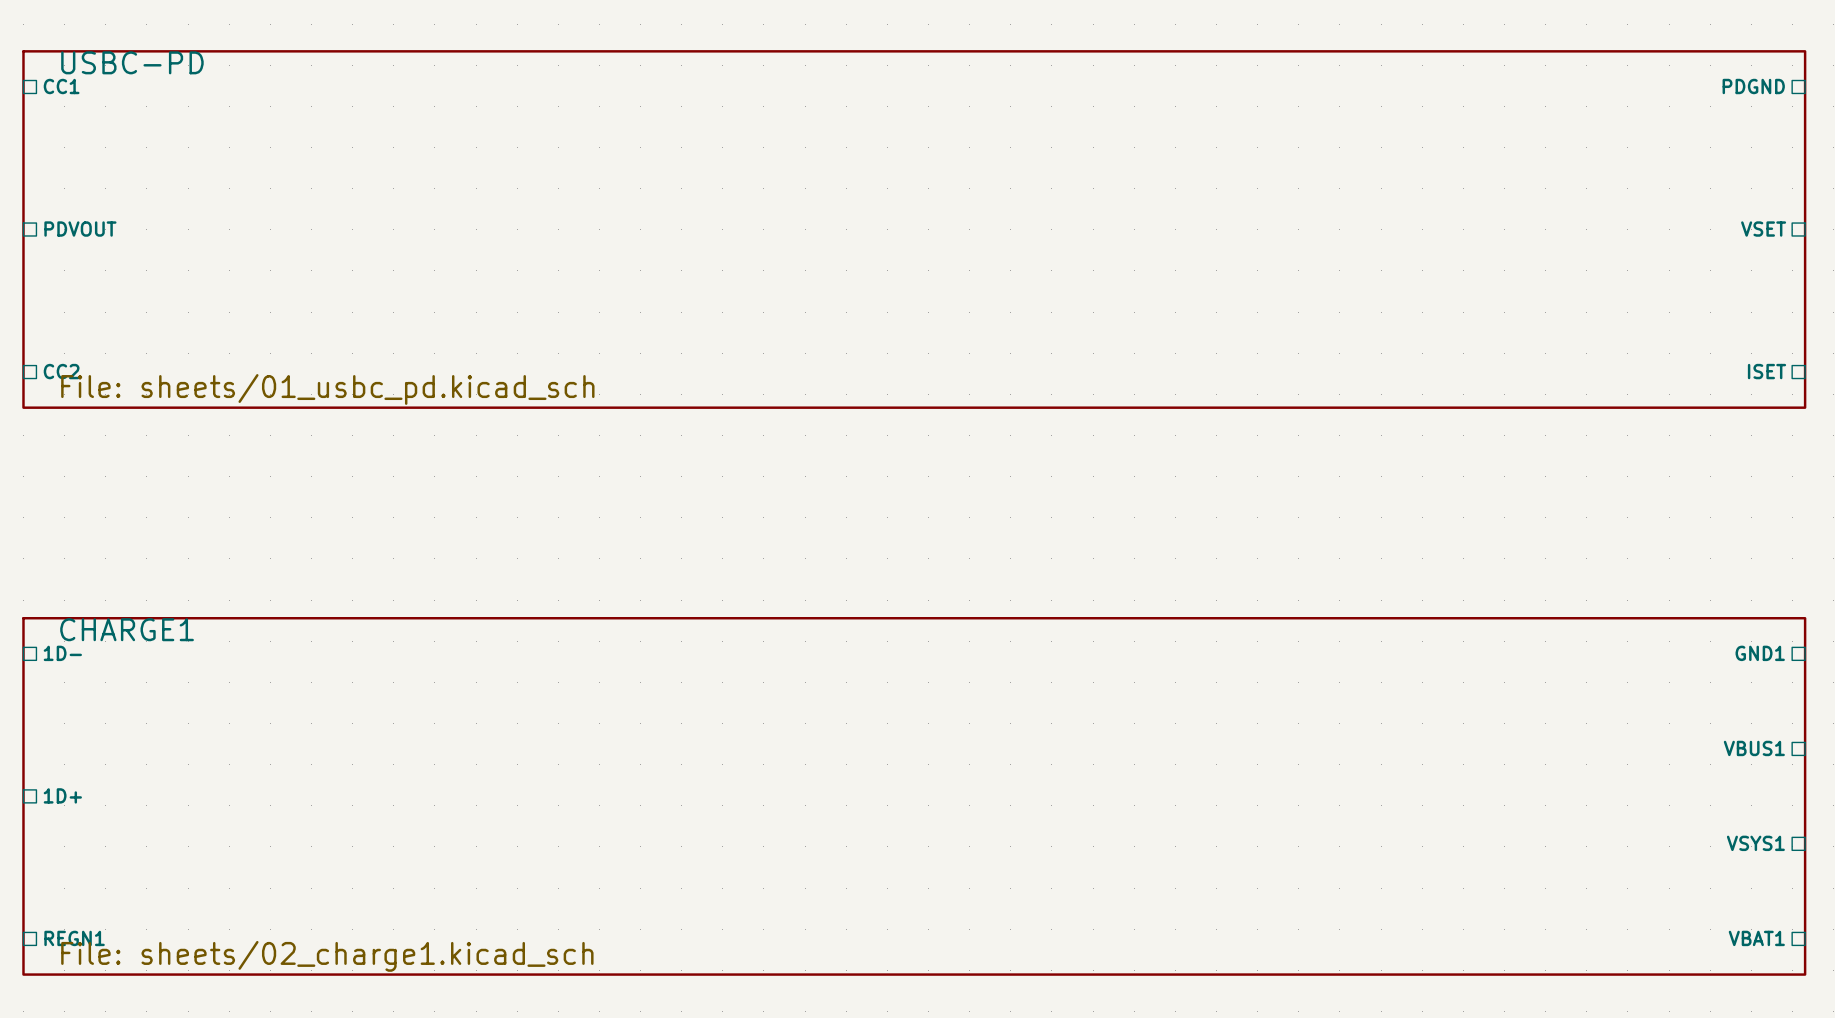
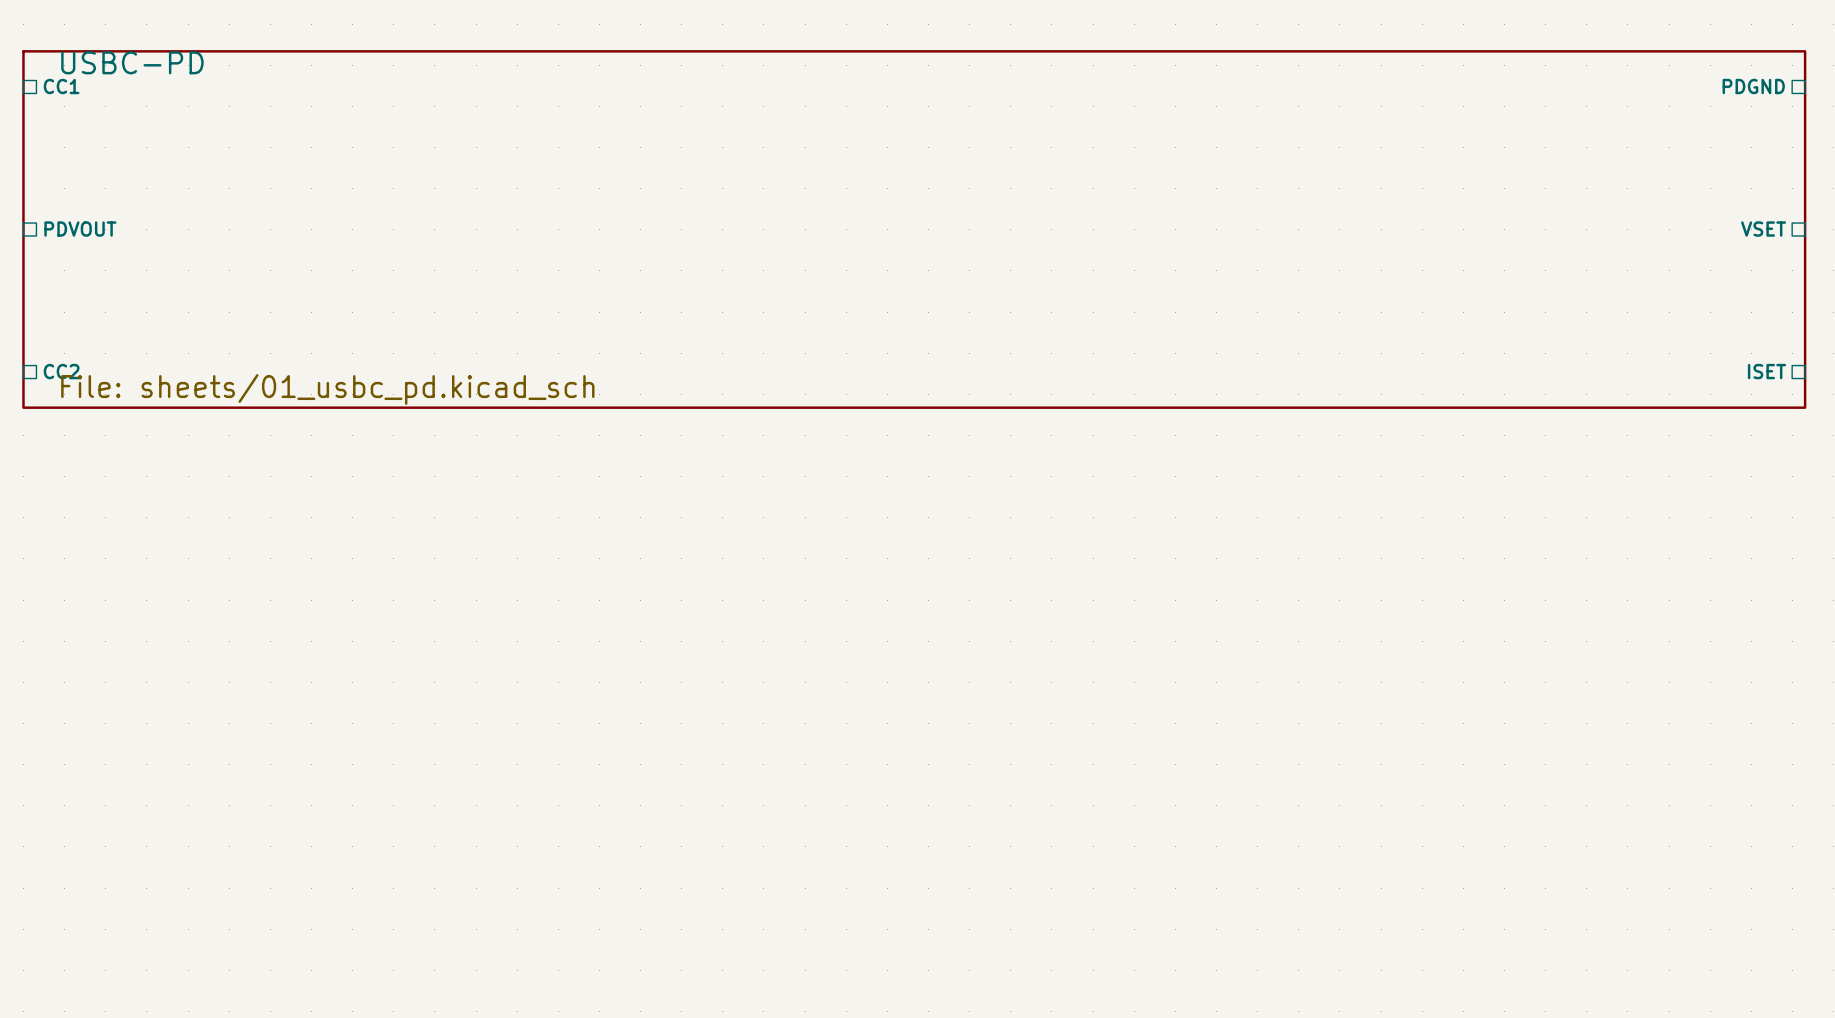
sheet pin: 1D- (62, 653) -> none
sheet pin: GND1 (1760, 653) -> none
sheet pin: VBUS1 (1754, 748) -> none
sheet pin: 1D+ (62, 795) -> none
sheet CHARGE1: File: sheets/02_charge1.kicad_sch (914, 796) -> none
sheet pin: VSYS1 (1755, 843) -> none
sheet pin: REGN1 (74, 938) -> none
sheet pin: VBAT1 (1756, 938) -> none

